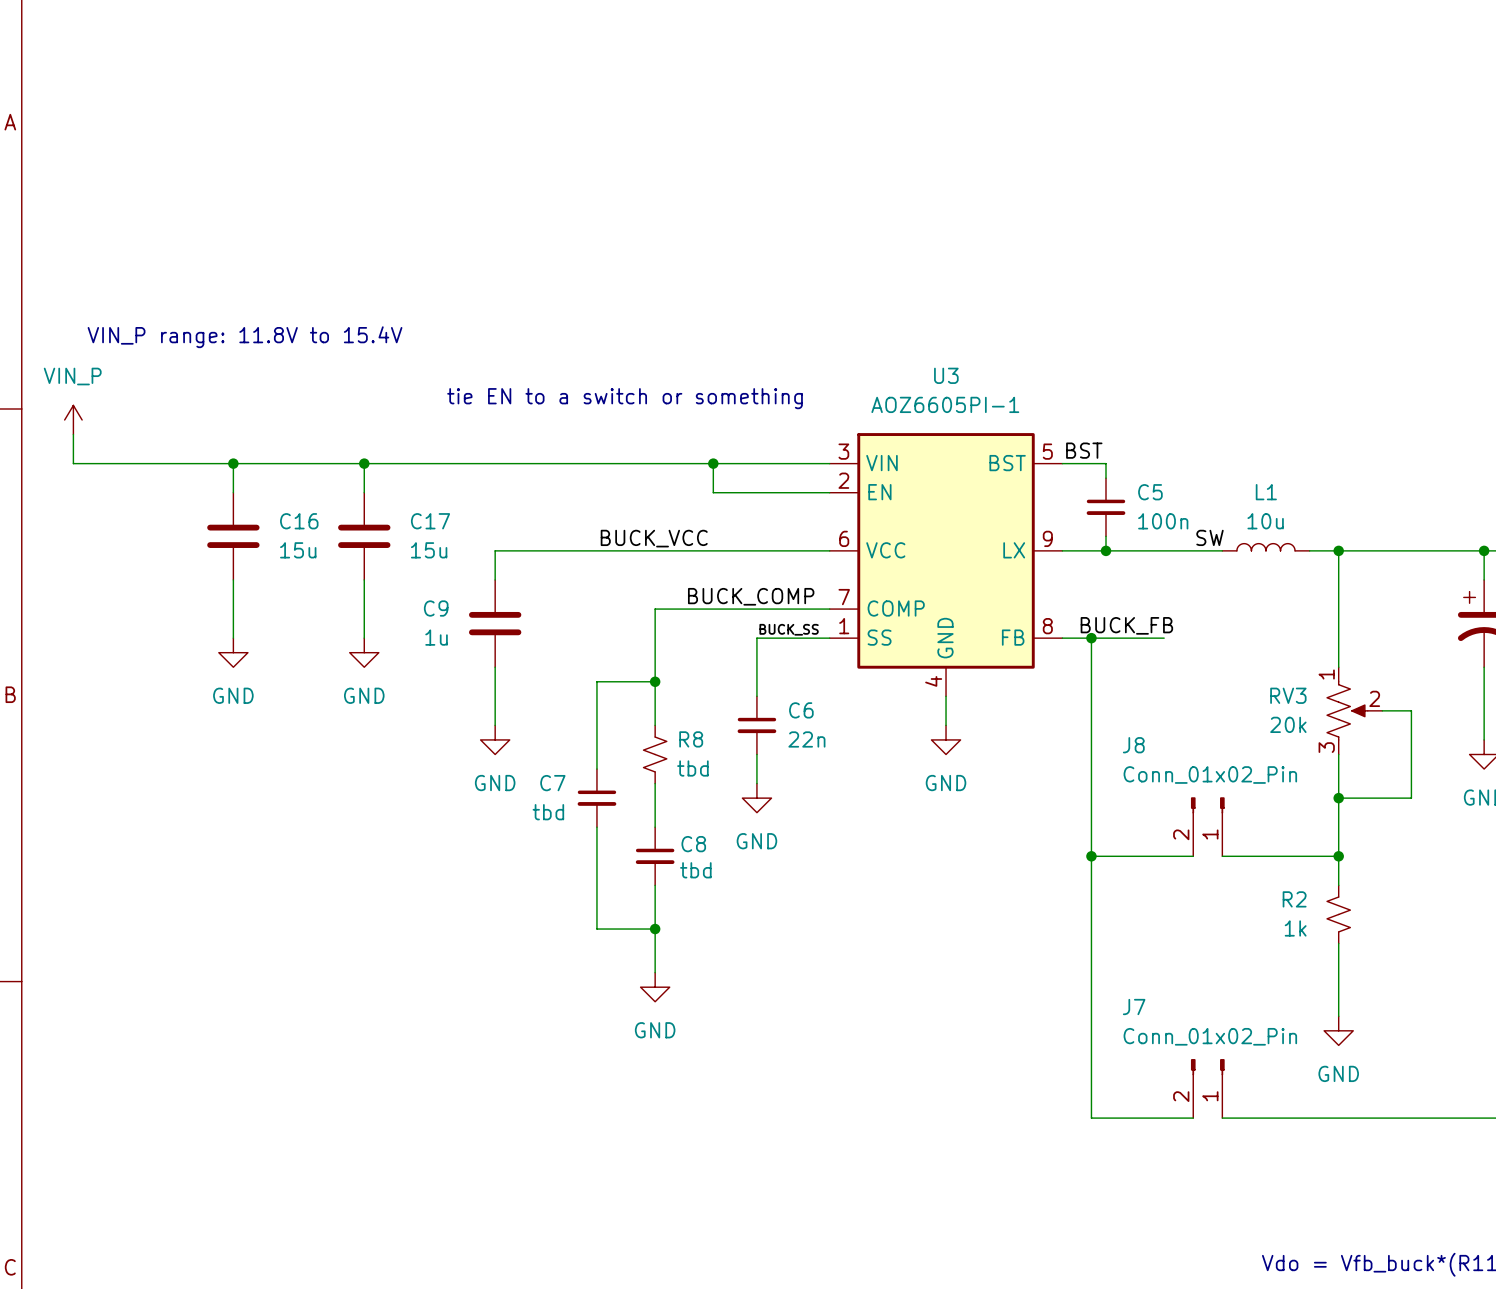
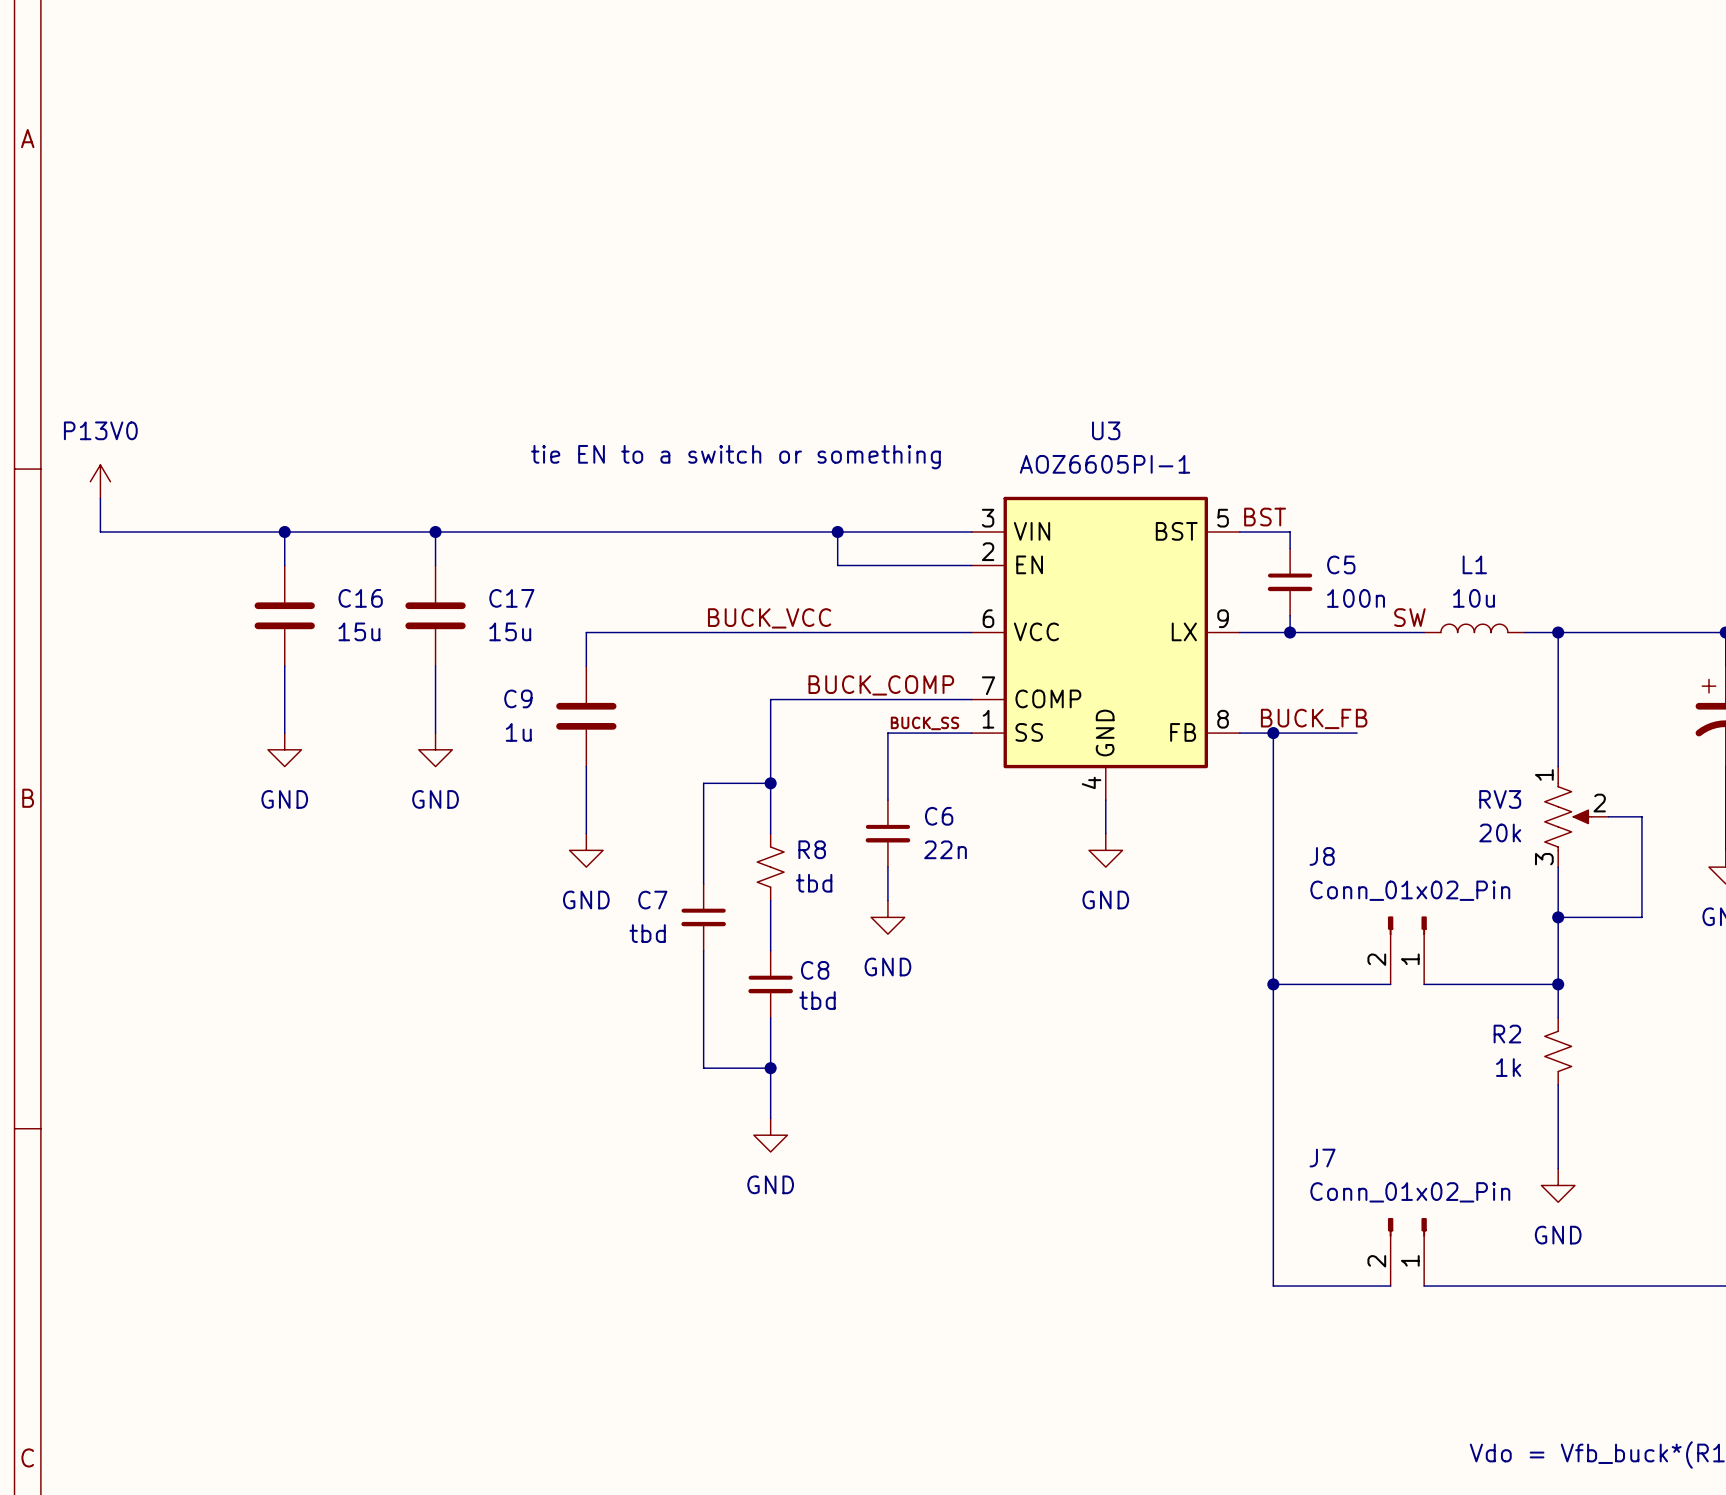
text: VIN_P range: 11.8V to 15.4V (245, 337) -> none
power symbol: VIN_P (73, 419) -> P13V0 (100, 481)

